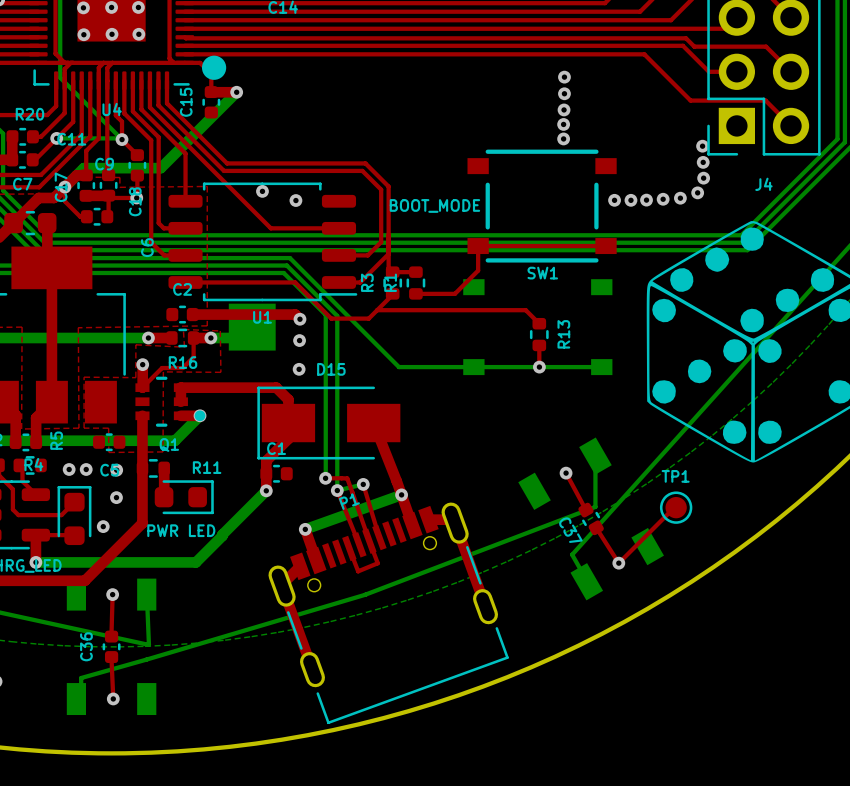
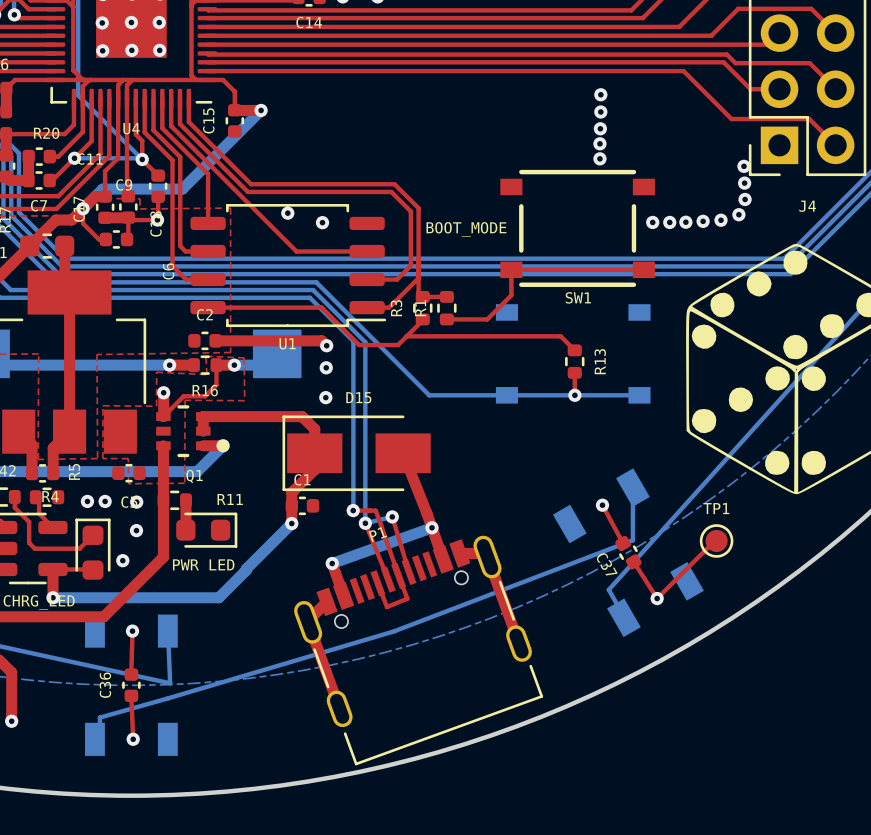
drawing: [201, 55, 227, 80] -> none

